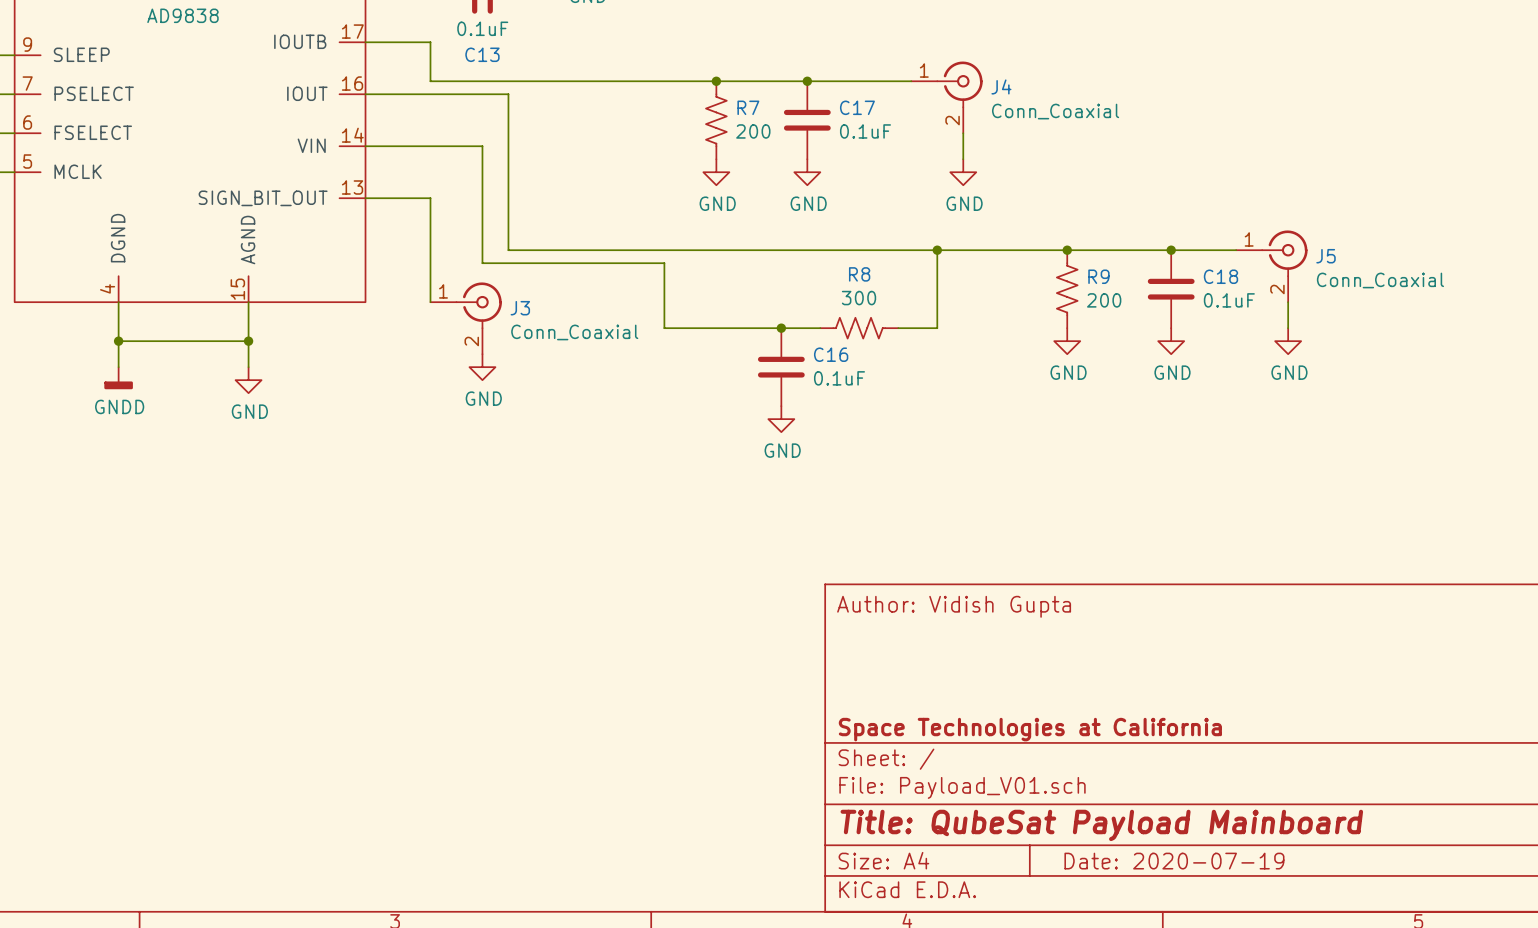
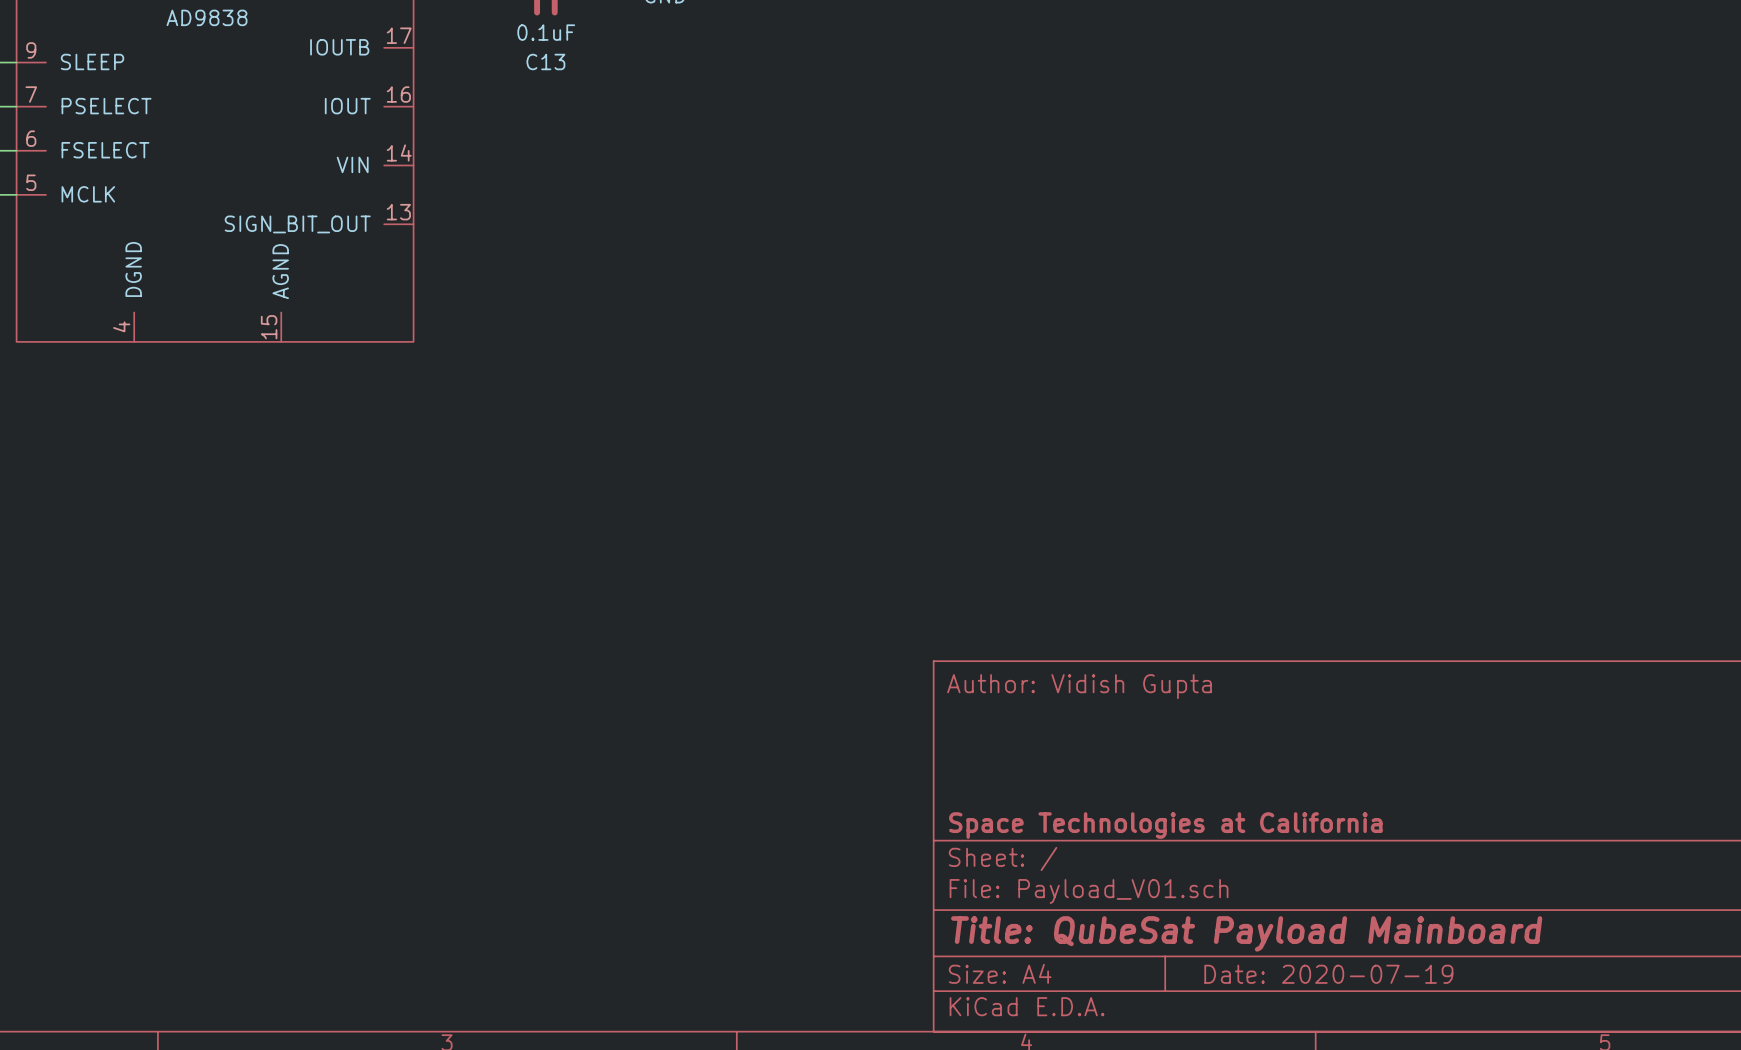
wire: (365, 42) (430, 42) (430, 81) (911, 81) -> none
junction: (716, 81) -> none
junction: (807, 81) -> none
wire: (365, 94) (508, 94) (508, 250) (1236, 250) -> none
J4: Conn_Coaxial (947, 97) -> none
R7: 200 (716, 120) -> none
C17: 0.1uF (807, 120) -> none
wire: (963, 133) (963, 159) -> none
wire: (365, 146) (482, 146) (482, 263) (664, 263) (664, 328) (820, 328) -> none
power symbol: GND (716, 172) -> none
power symbol: GND (807, 172) -> none
power symbol: GND (963, 172) -> none
wire: (365, 198) (430, 198) (430, 302) -> none
wire: (937, 250) (937, 328) (898, 328) -> none
junction: (937, 250) -> none
junction: (1067, 250) -> none
junction: (1171, 250) -> none
J5: Conn_Coaxial (1271, 266) -> none
R9: 200 (1067, 289) -> none
C18: 0.1uF (1171, 289) -> none
wire: (118, 302) (118, 367) -> none
wire: (248, 302) (248, 367) -> none
wire: (1288, 302) (1288, 328) -> none
J3: Conn_Coaxial (466, 318) -> none
junction: (781, 328) -> none
R8: 300 (859, 328) -> none
wire: (118, 341) (248, 341) -> none
junction: (118, 341) -> none
junction: (248, 341) -> none
power symbol: GND (1067, 341) -> none
power symbol: GND (1171, 341) -> none
power symbol: GND (1288, 341) -> none
power symbol: GND (482, 367) -> none
C16: 0.1uF (781, 367) -> none
power symbol: GNDD (118, 378) -> none
power symbol: GND (248, 380) -> none
power symbol: GND (781, 419) -> none

